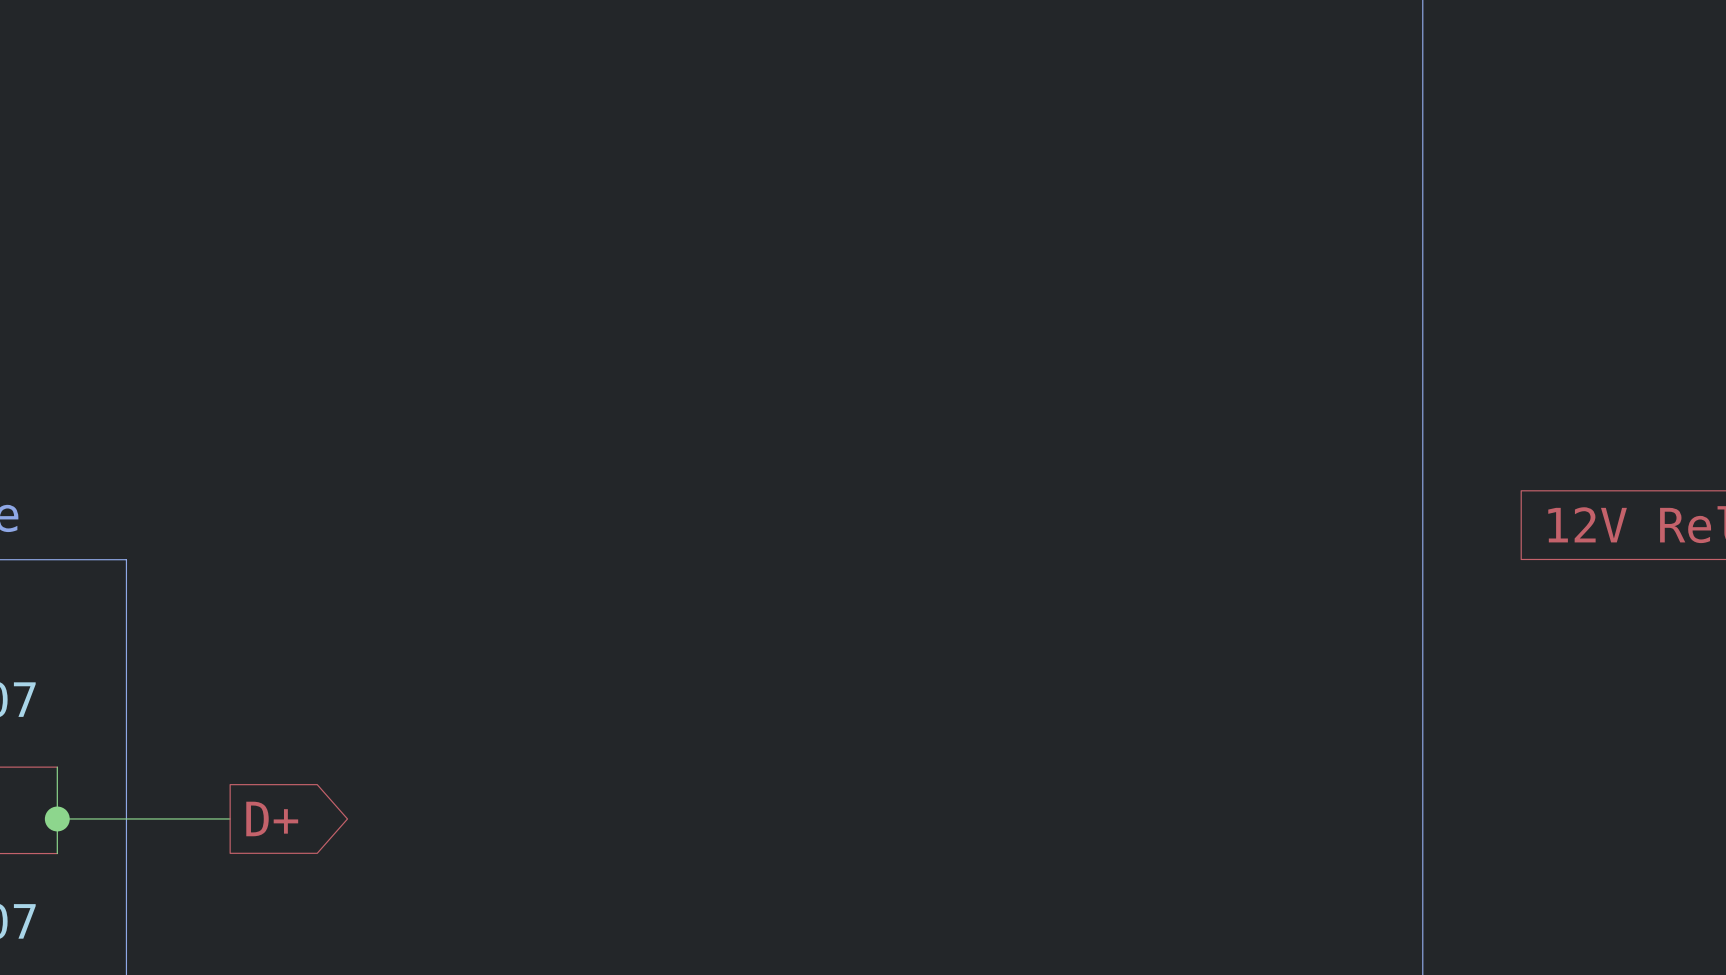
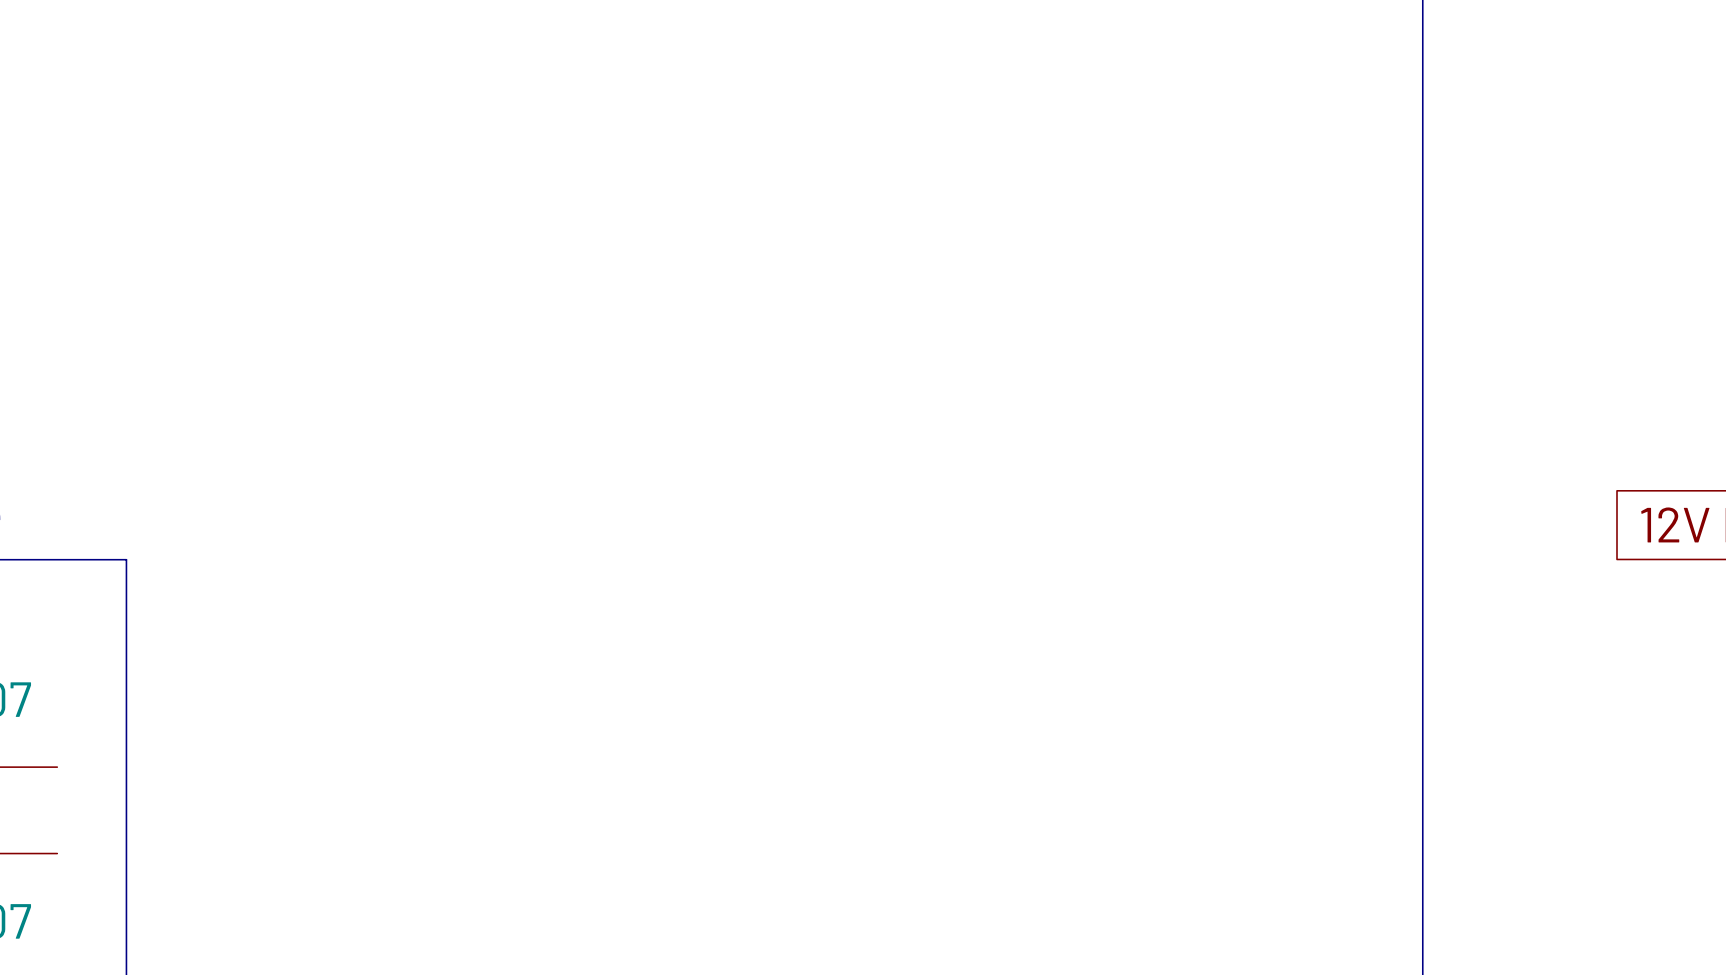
wire: (57, 767) (57, 853) -> none
wire: (57, 818) (230, 818) -> none
junction: (57, 818) -> none
global label: D+ (272, 818) -> none

